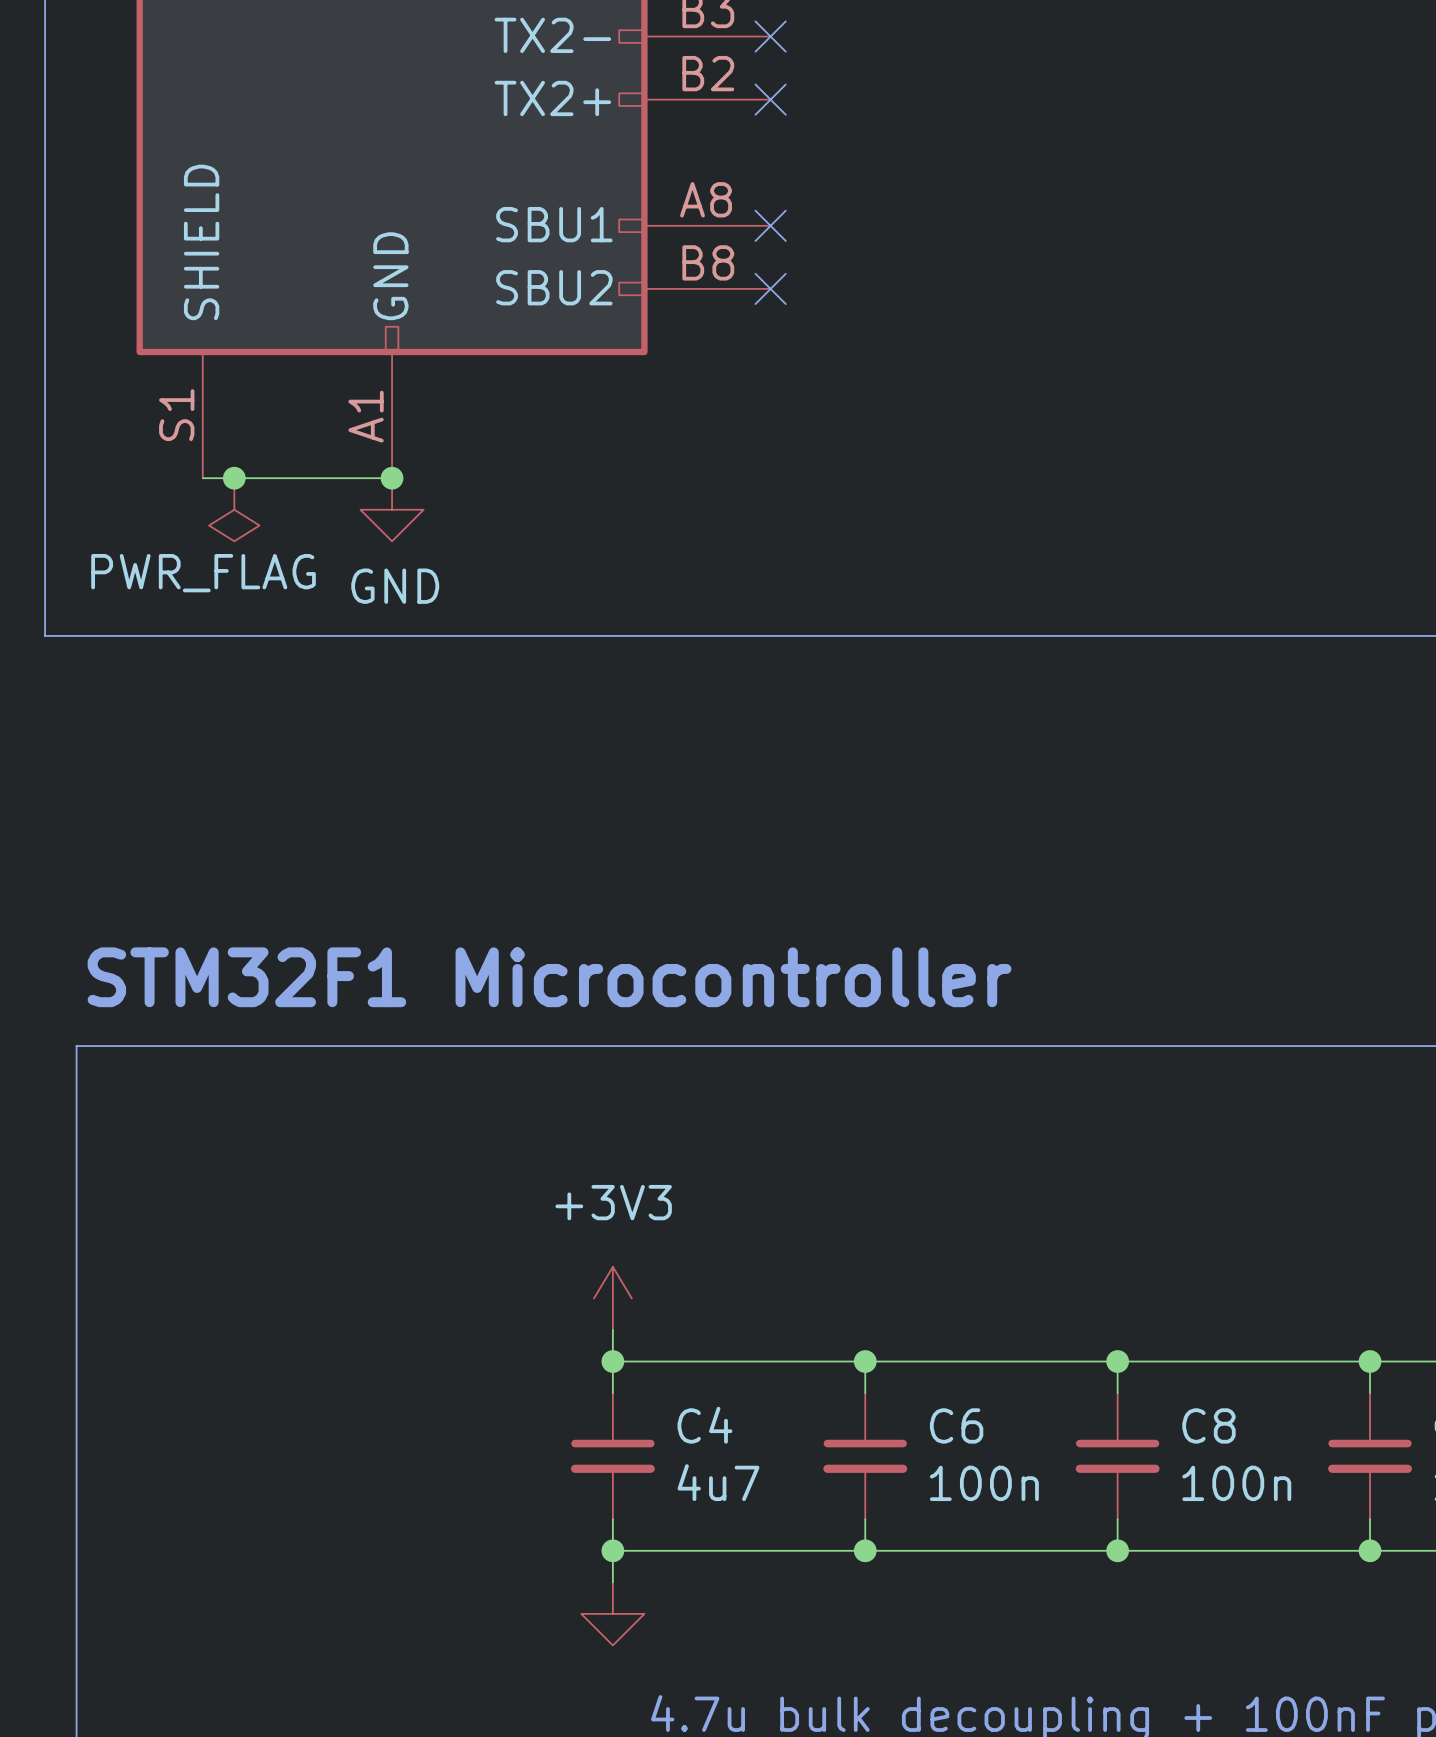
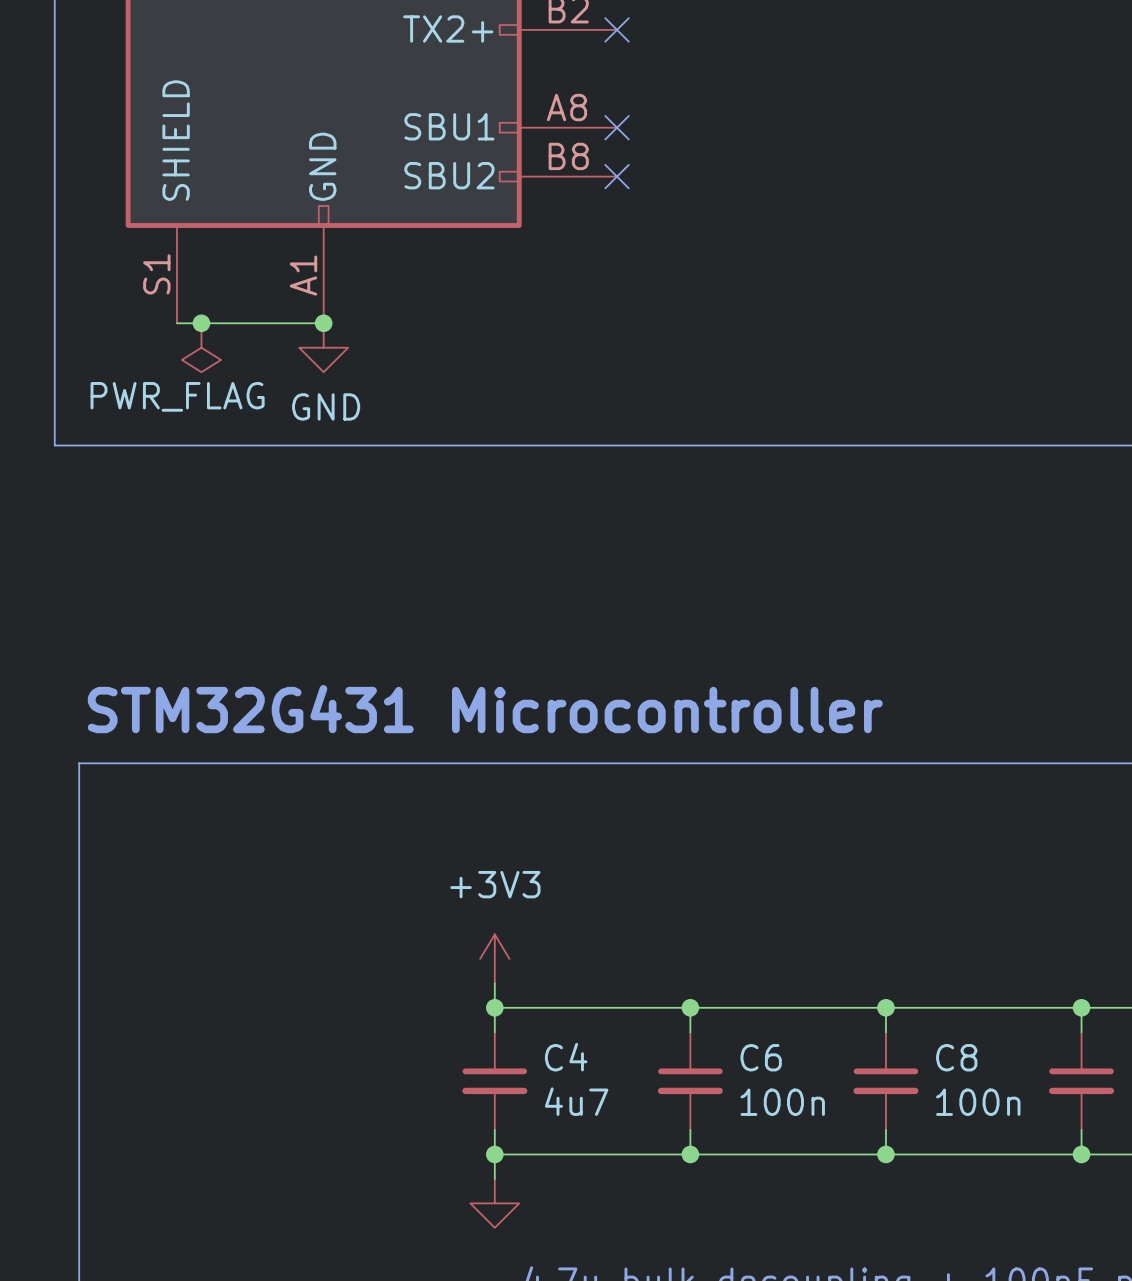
text: STM32F1 Microcontroller (549, 977) -> STM32G431 Microcontroller (485, 709)

